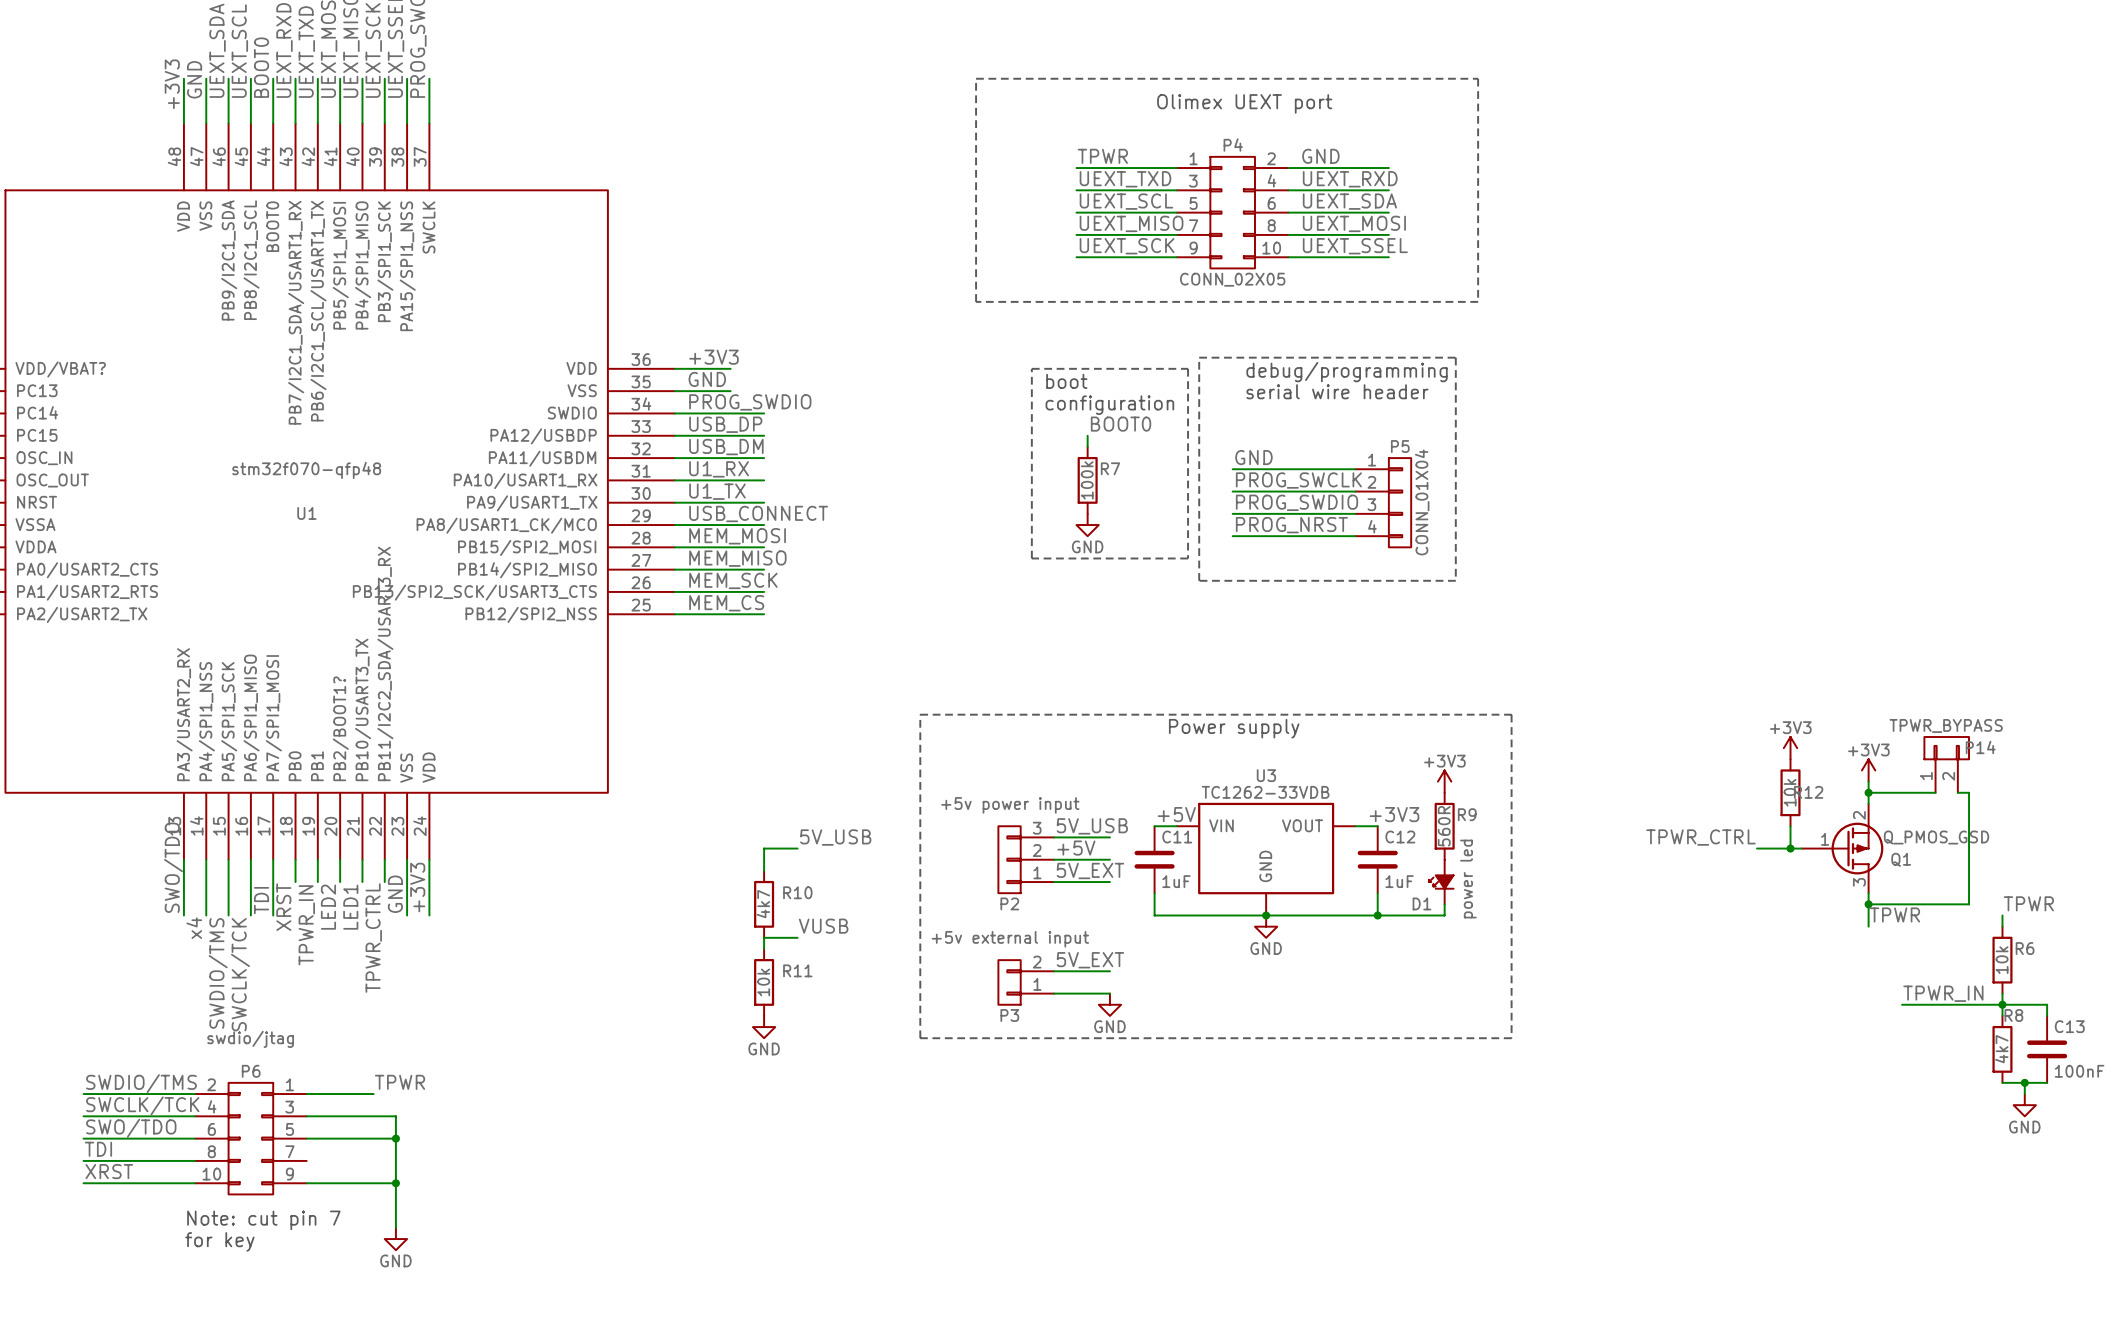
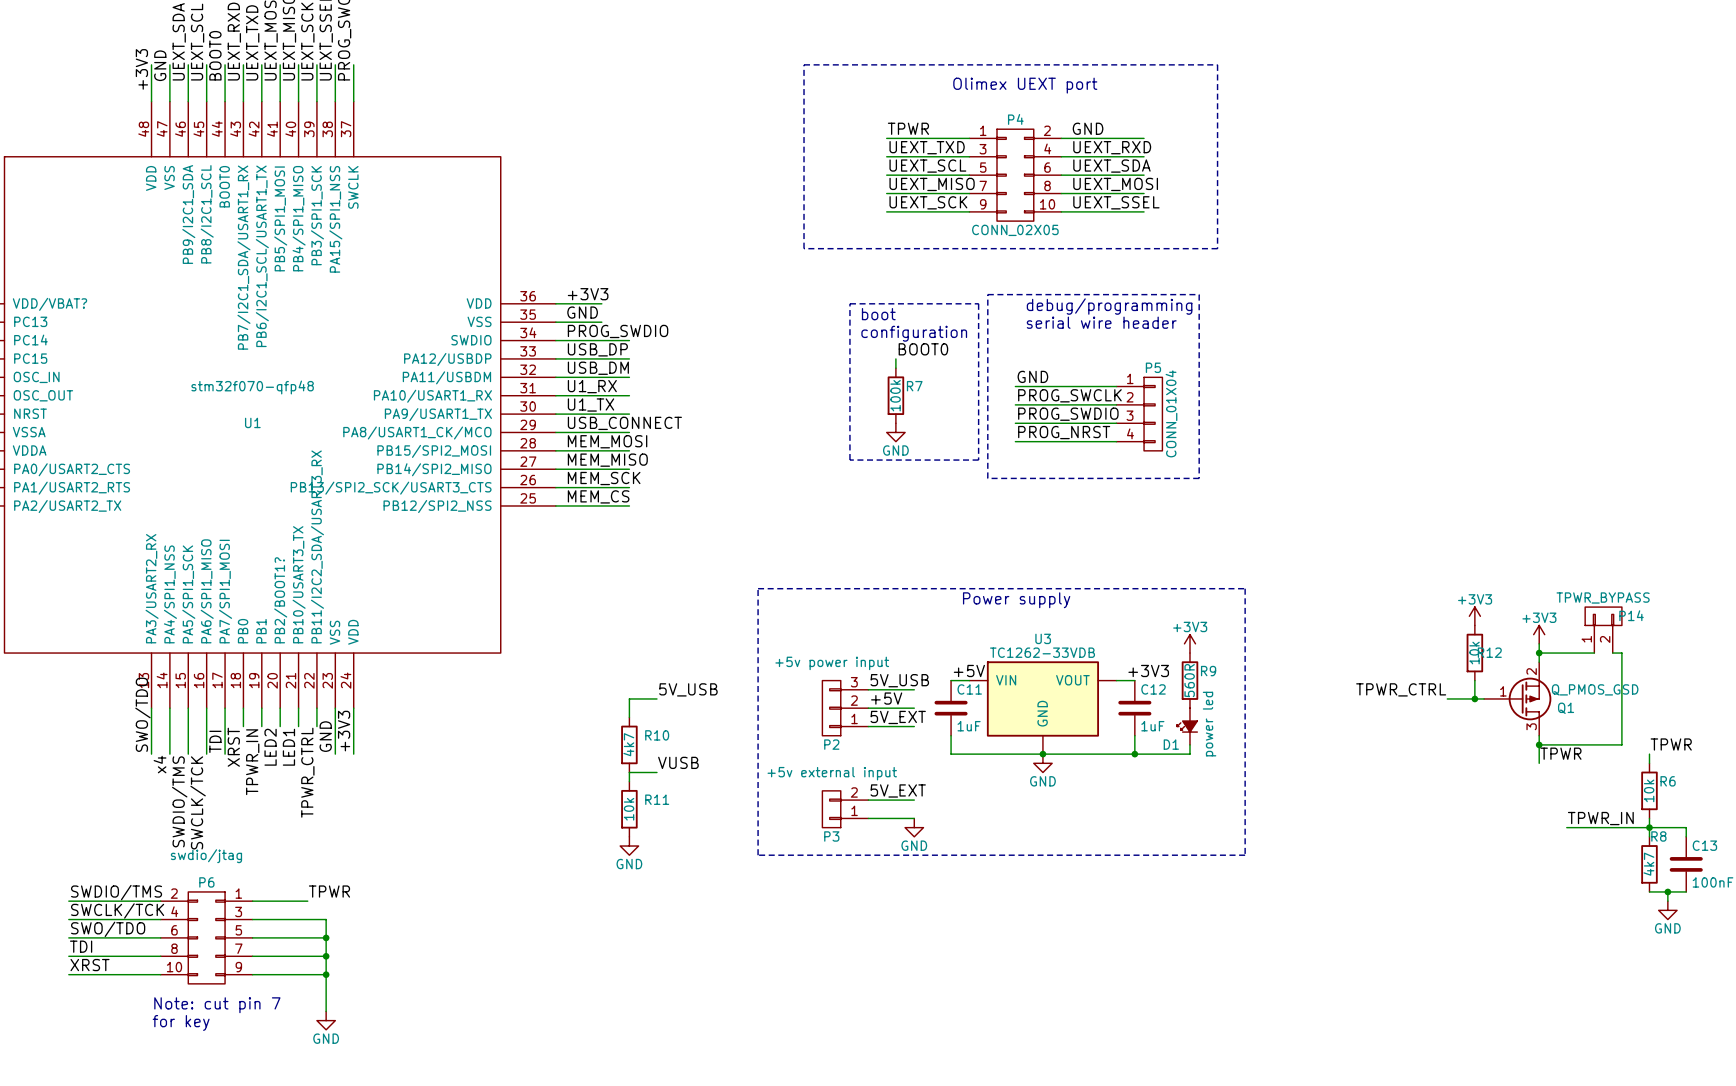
wire: none -> (252, 956) (326, 956)
junction: none -> (326, 956)

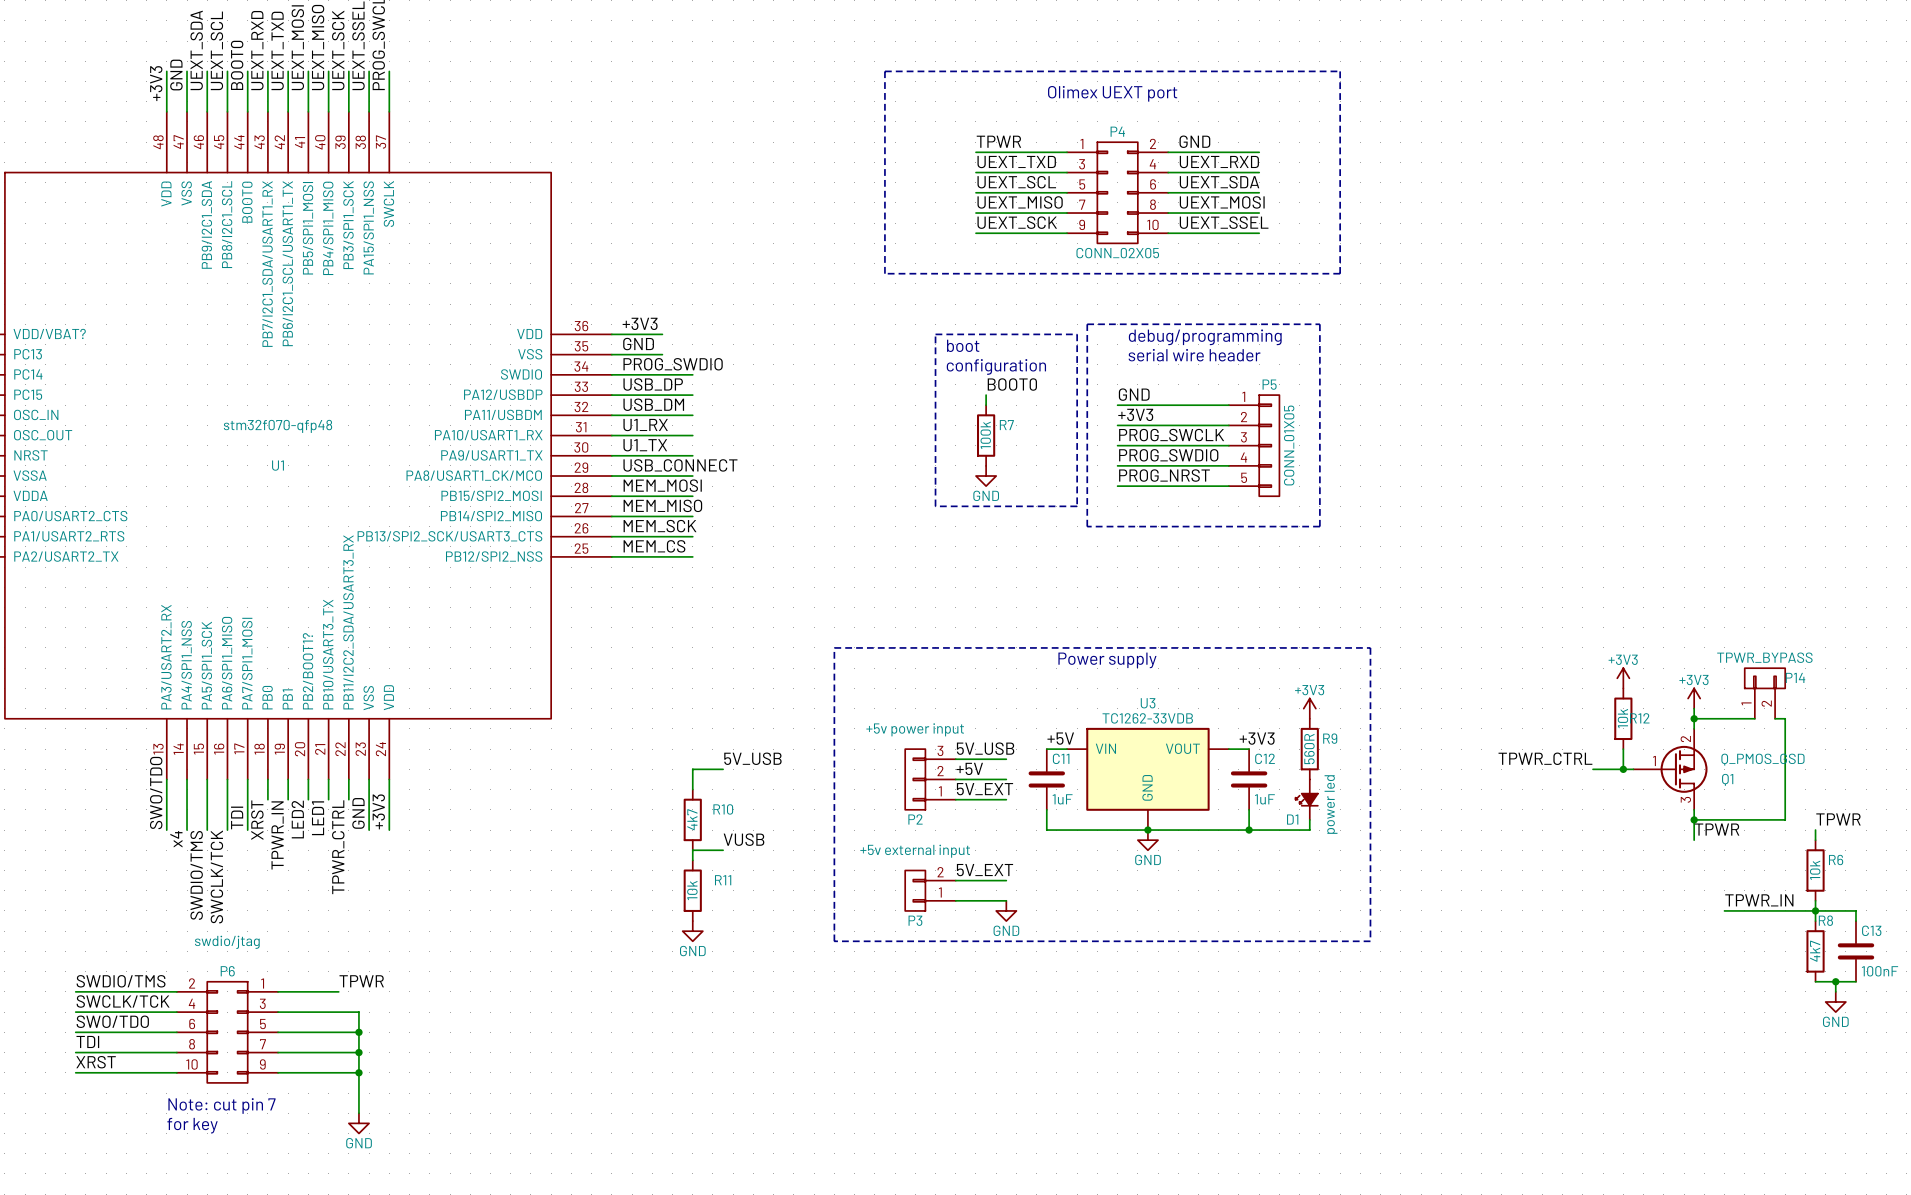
label: none -> GND (1134, 394)
wire: none -> (1117, 405) (1228, 405)
label: GND (1032, 376) -> +3V3 (1135, 414)
P5 symbol: [1116, 377, 1163, 451] -> [1228, 395, 1280, 497]
P5 value: CONN_01X04 (1171, 413) -> CONN_01X05 (1289, 445)

